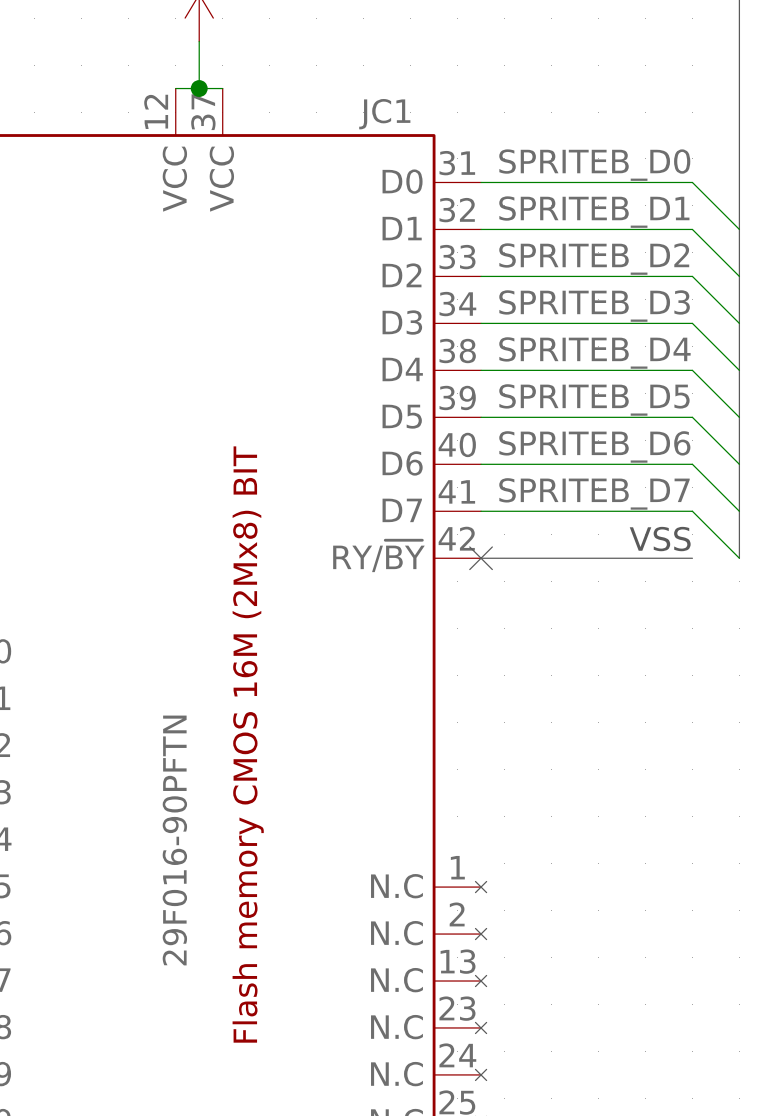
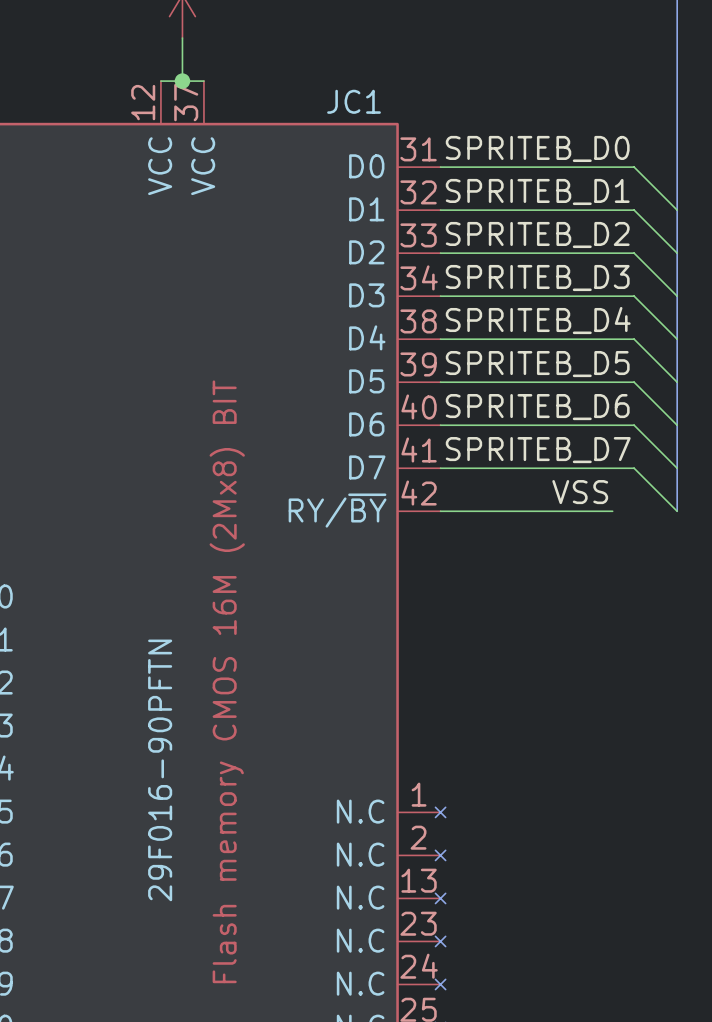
label: none -> VSS (580, 492)
text: VSS (660, 539) -> none
line: (481, 558) (692, 558) -> none
no-connect mark: (481, 558) -> none

